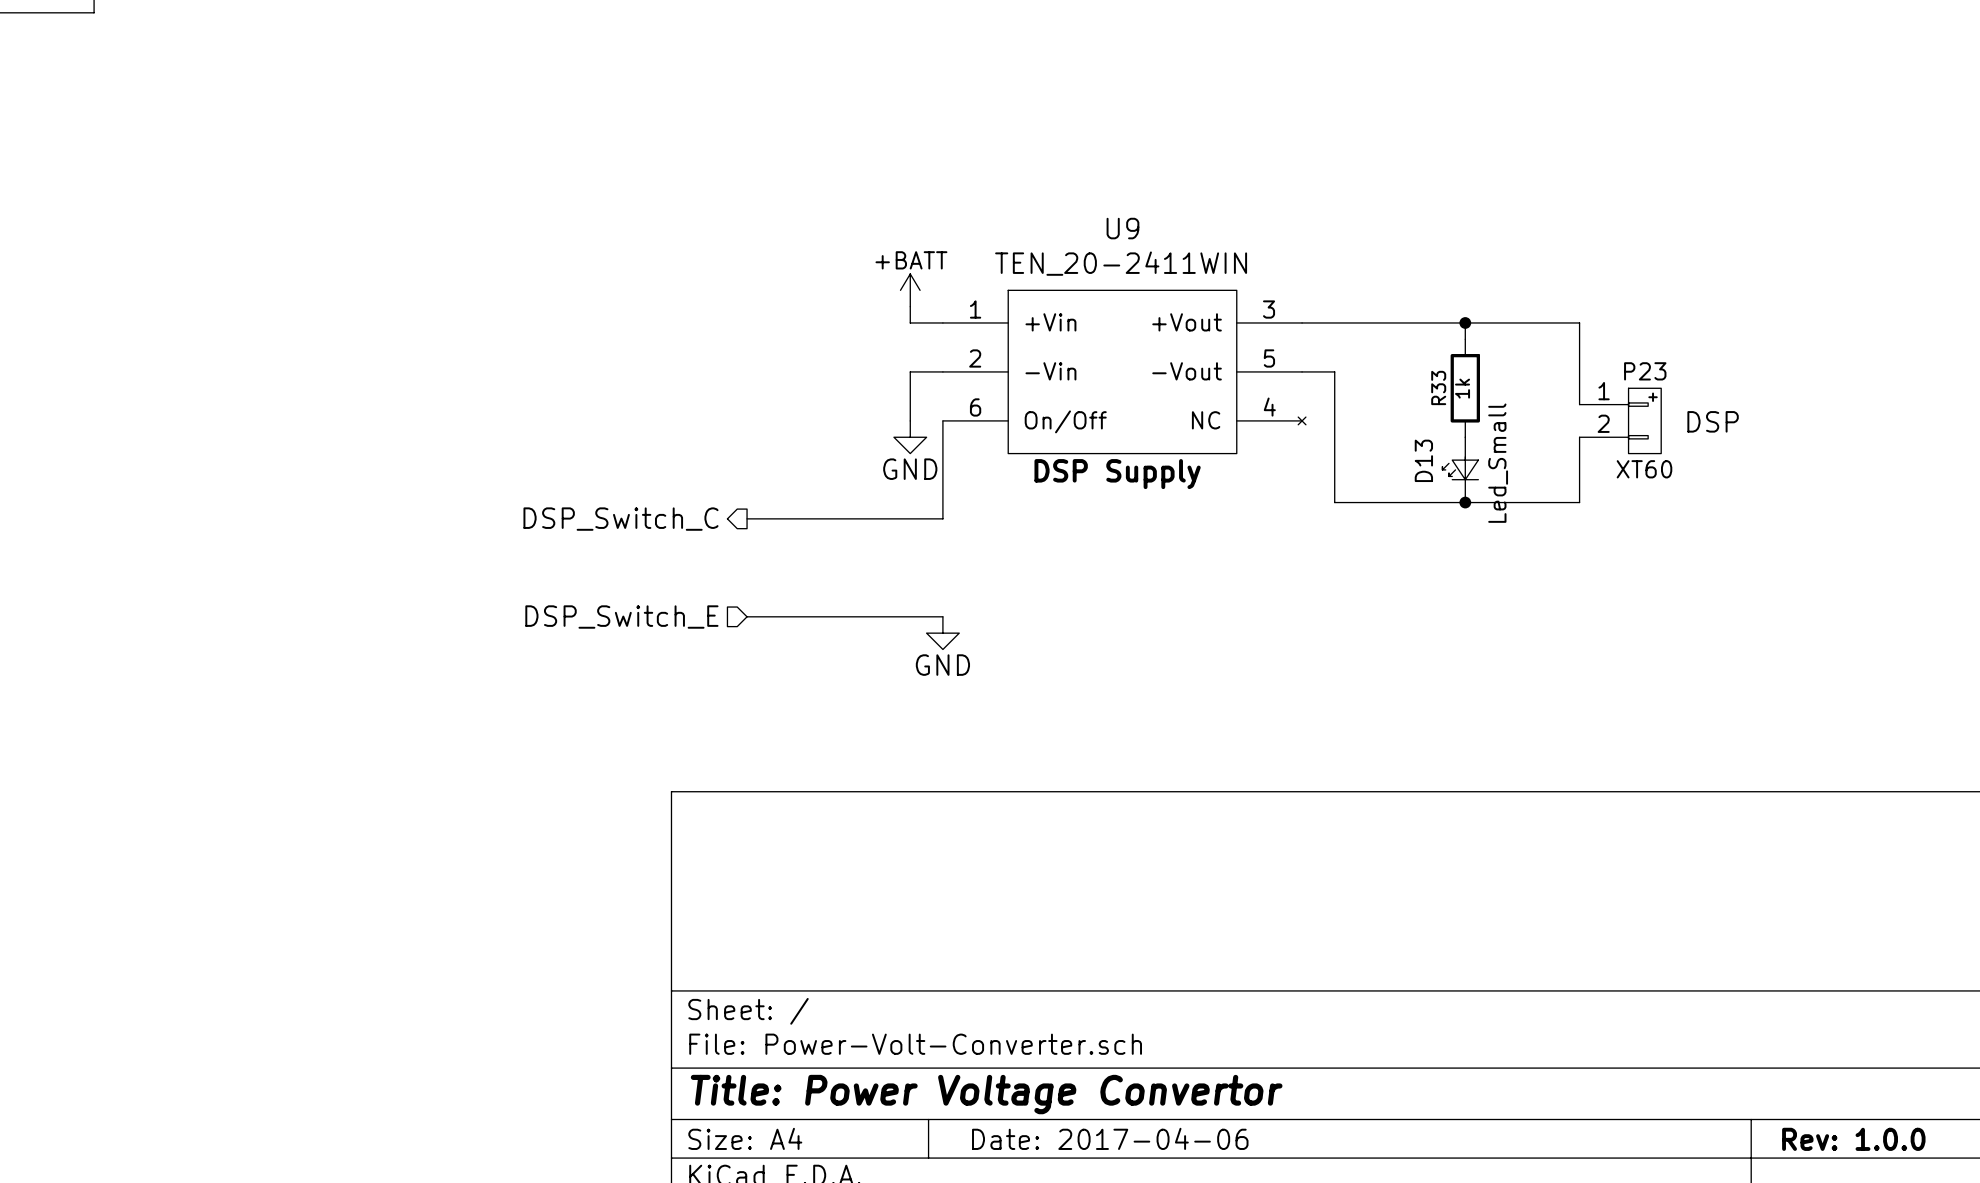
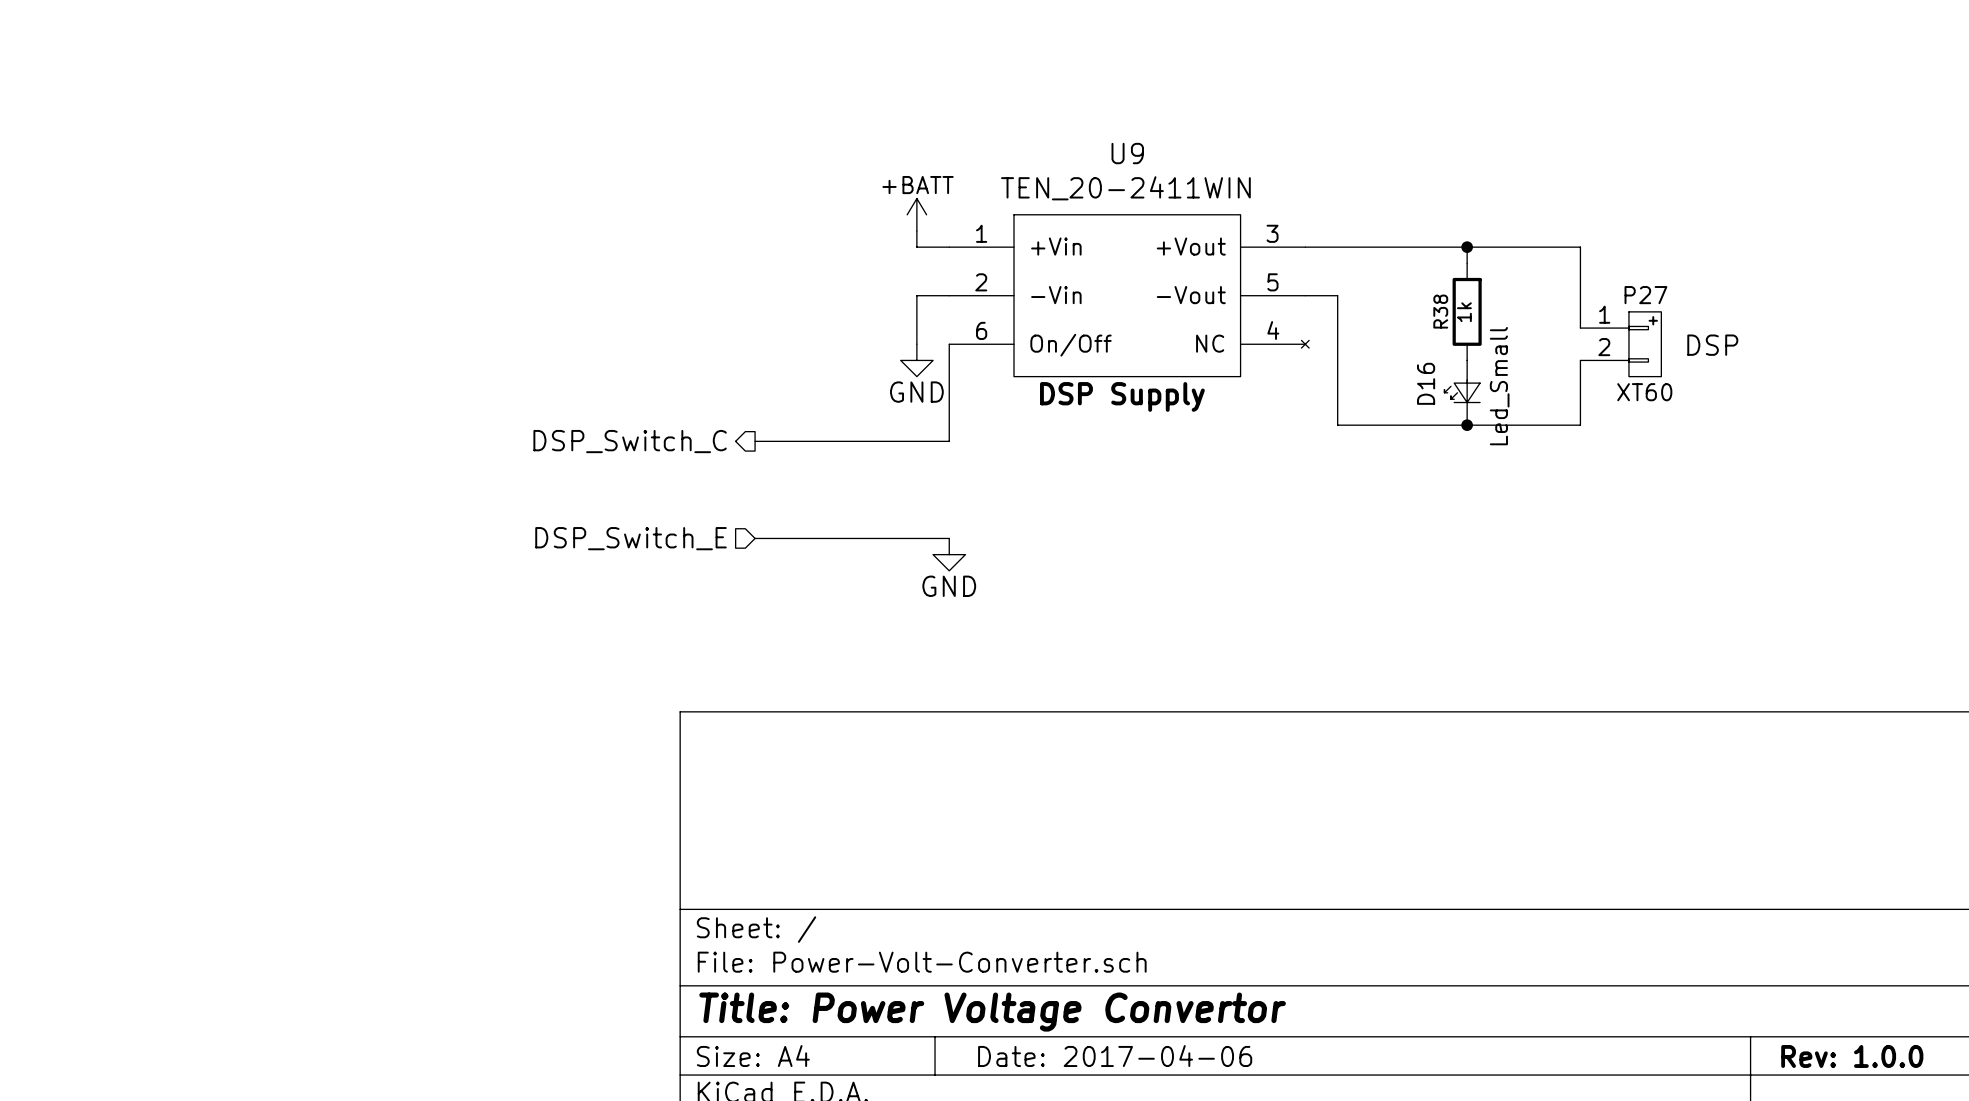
P23 name: P23 (1645, 371) -> P27 (1645, 295)
R33 name: R33 (1438, 387) -> R38 (1440, 311)
D13 name: D13 (1423, 460) -> D16 (1426, 383)

